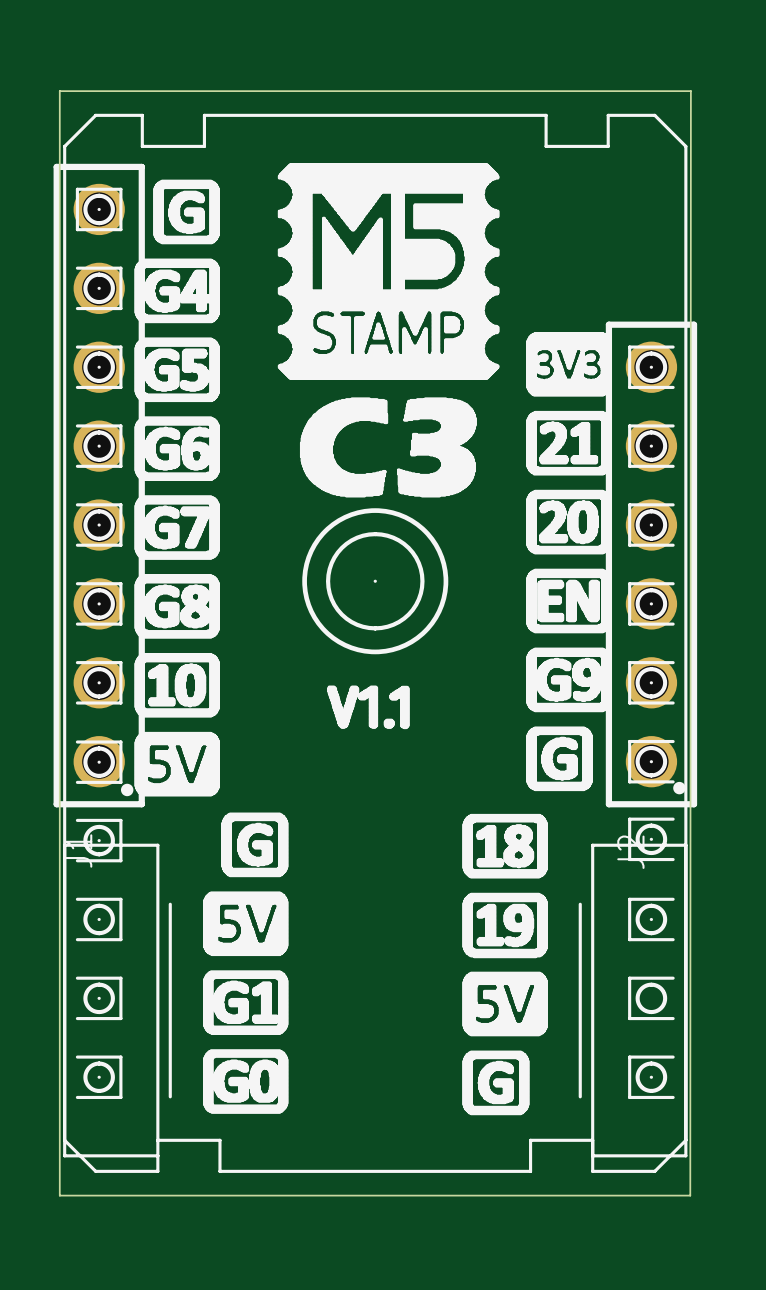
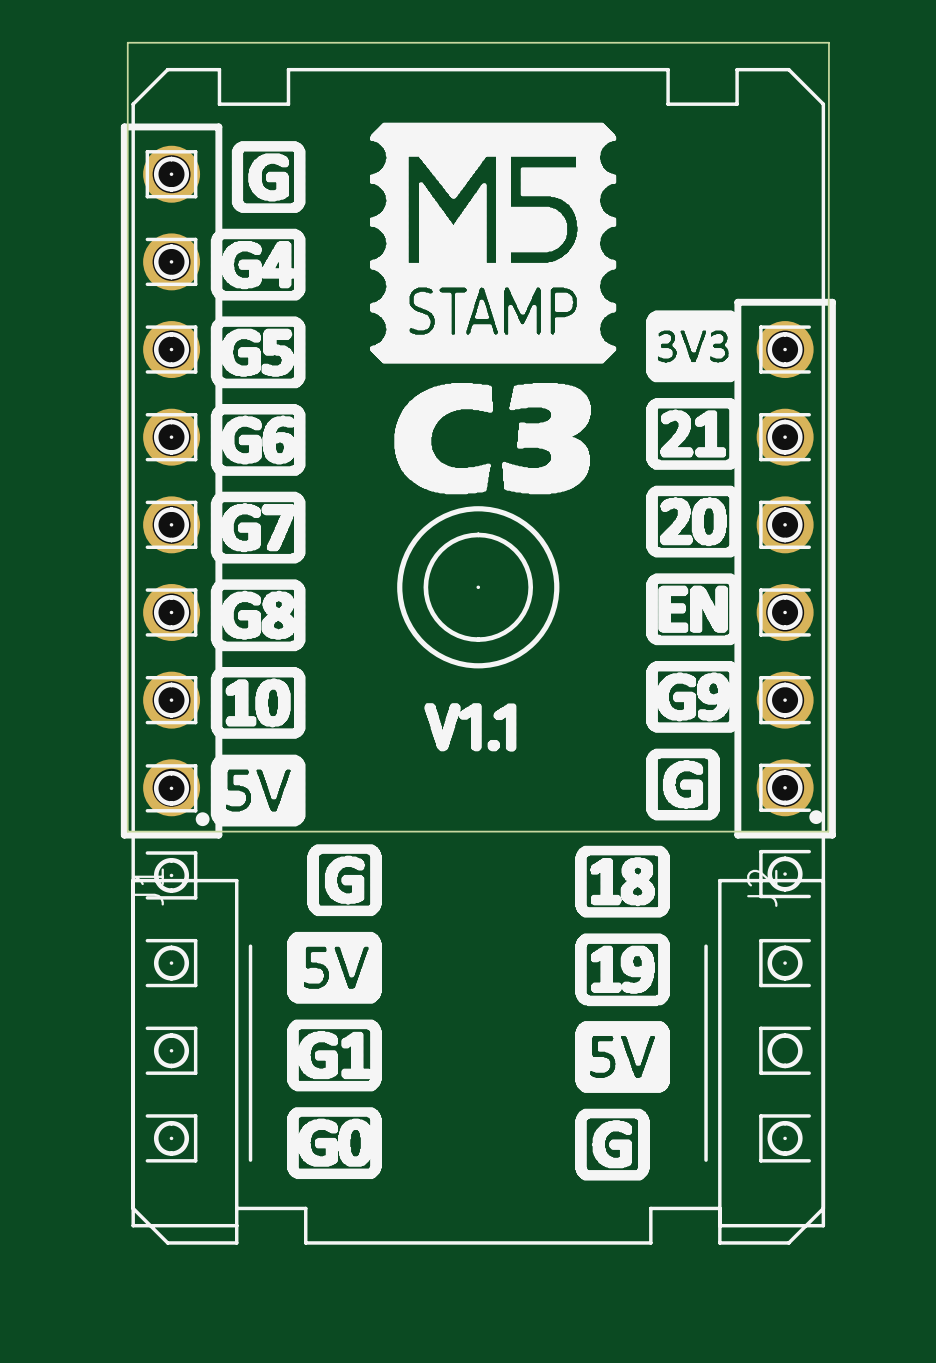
board edge: (690, 91) (690, 1195) (59, 1195) (59, 801) -> (828, 42) (828, 831) (127, 831)

